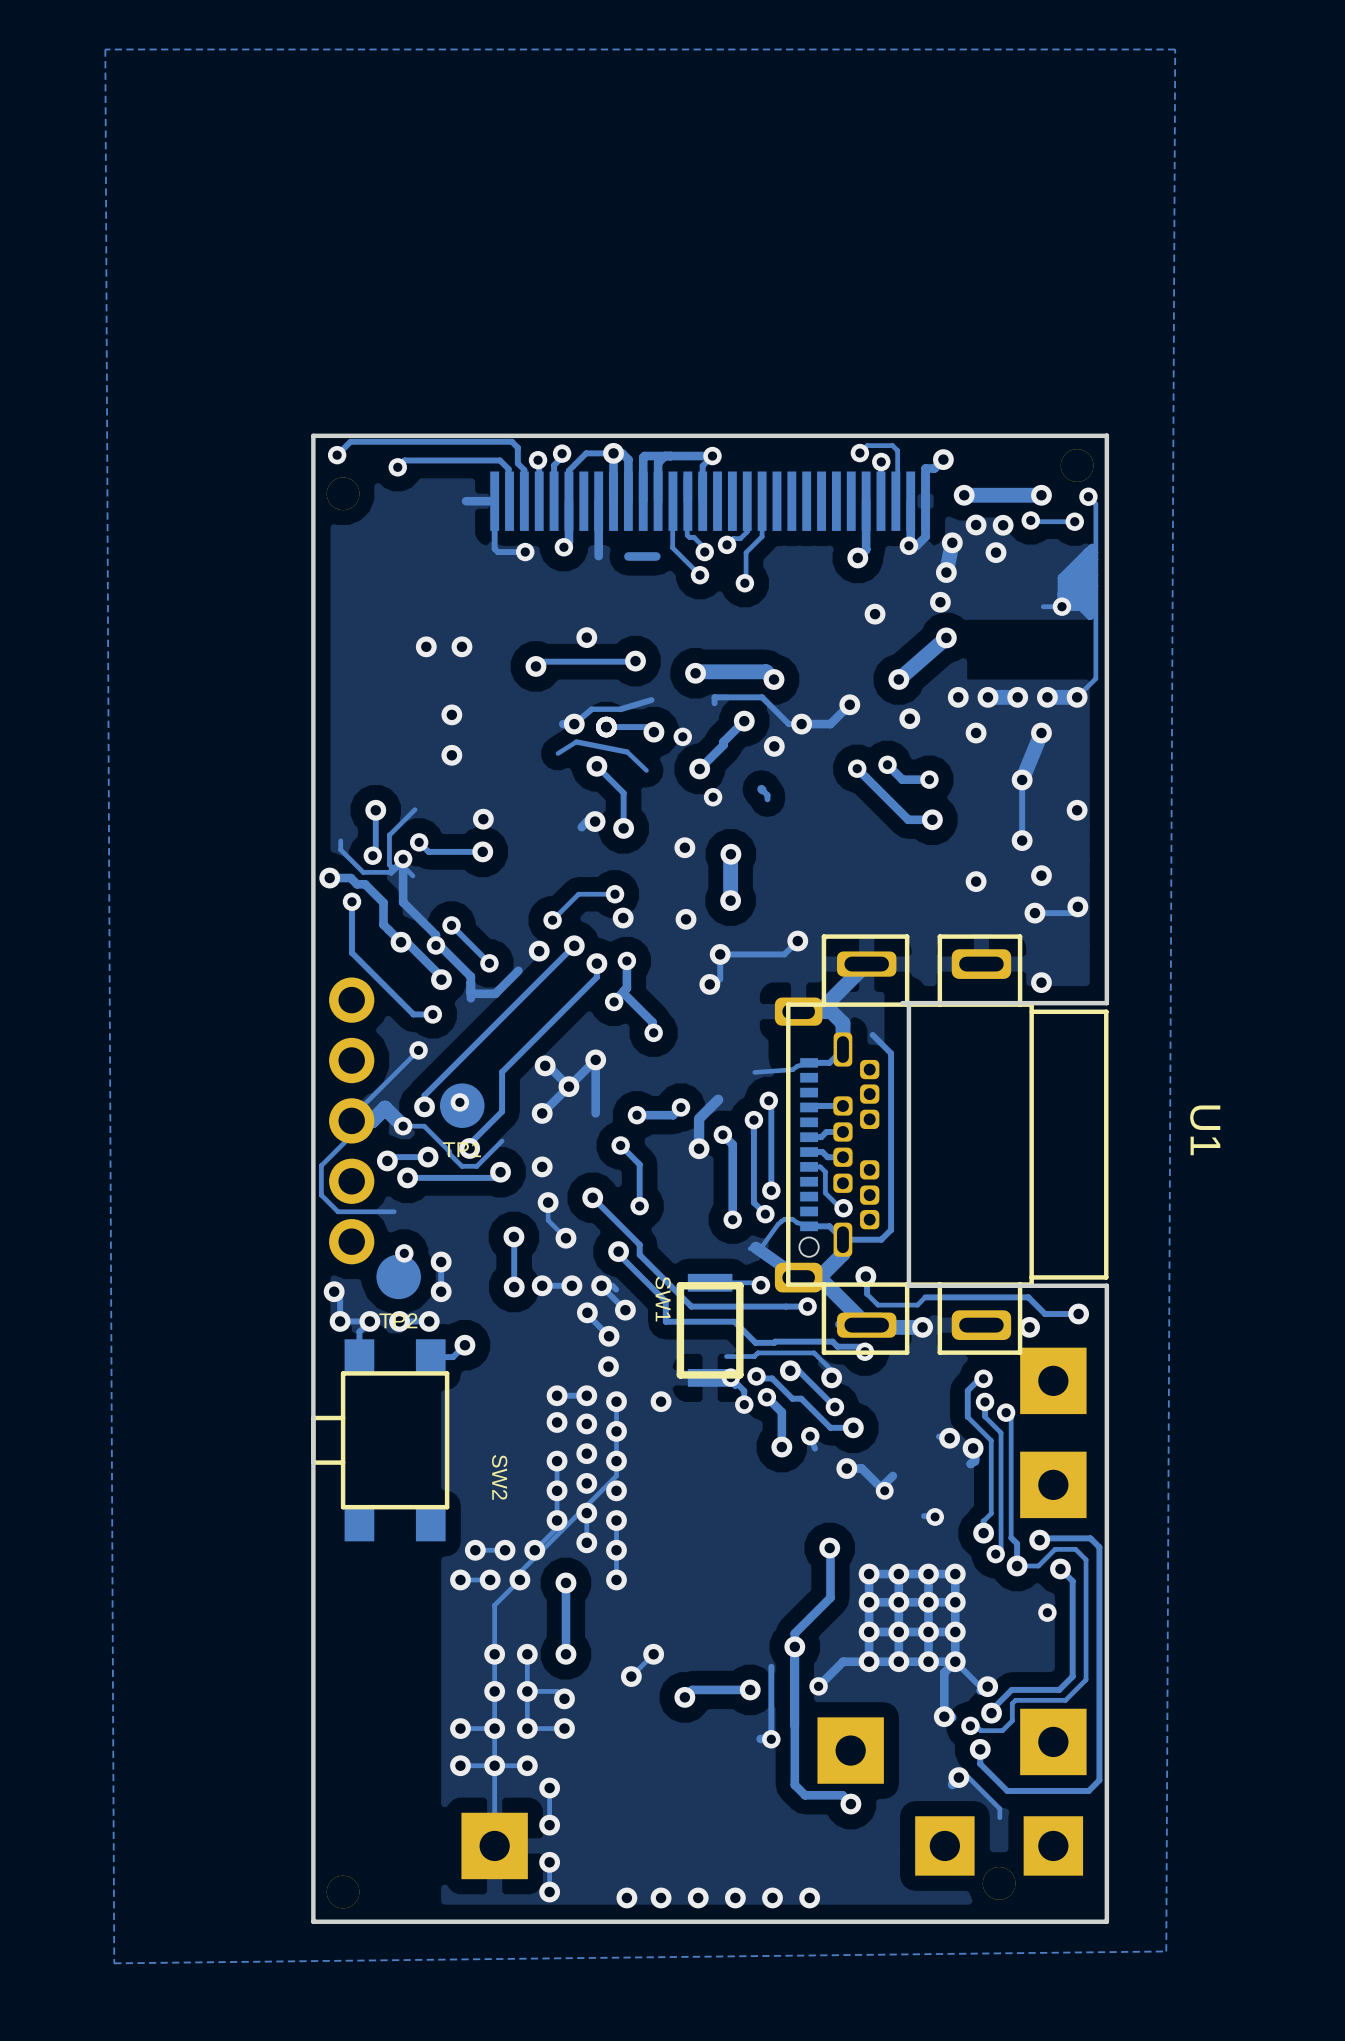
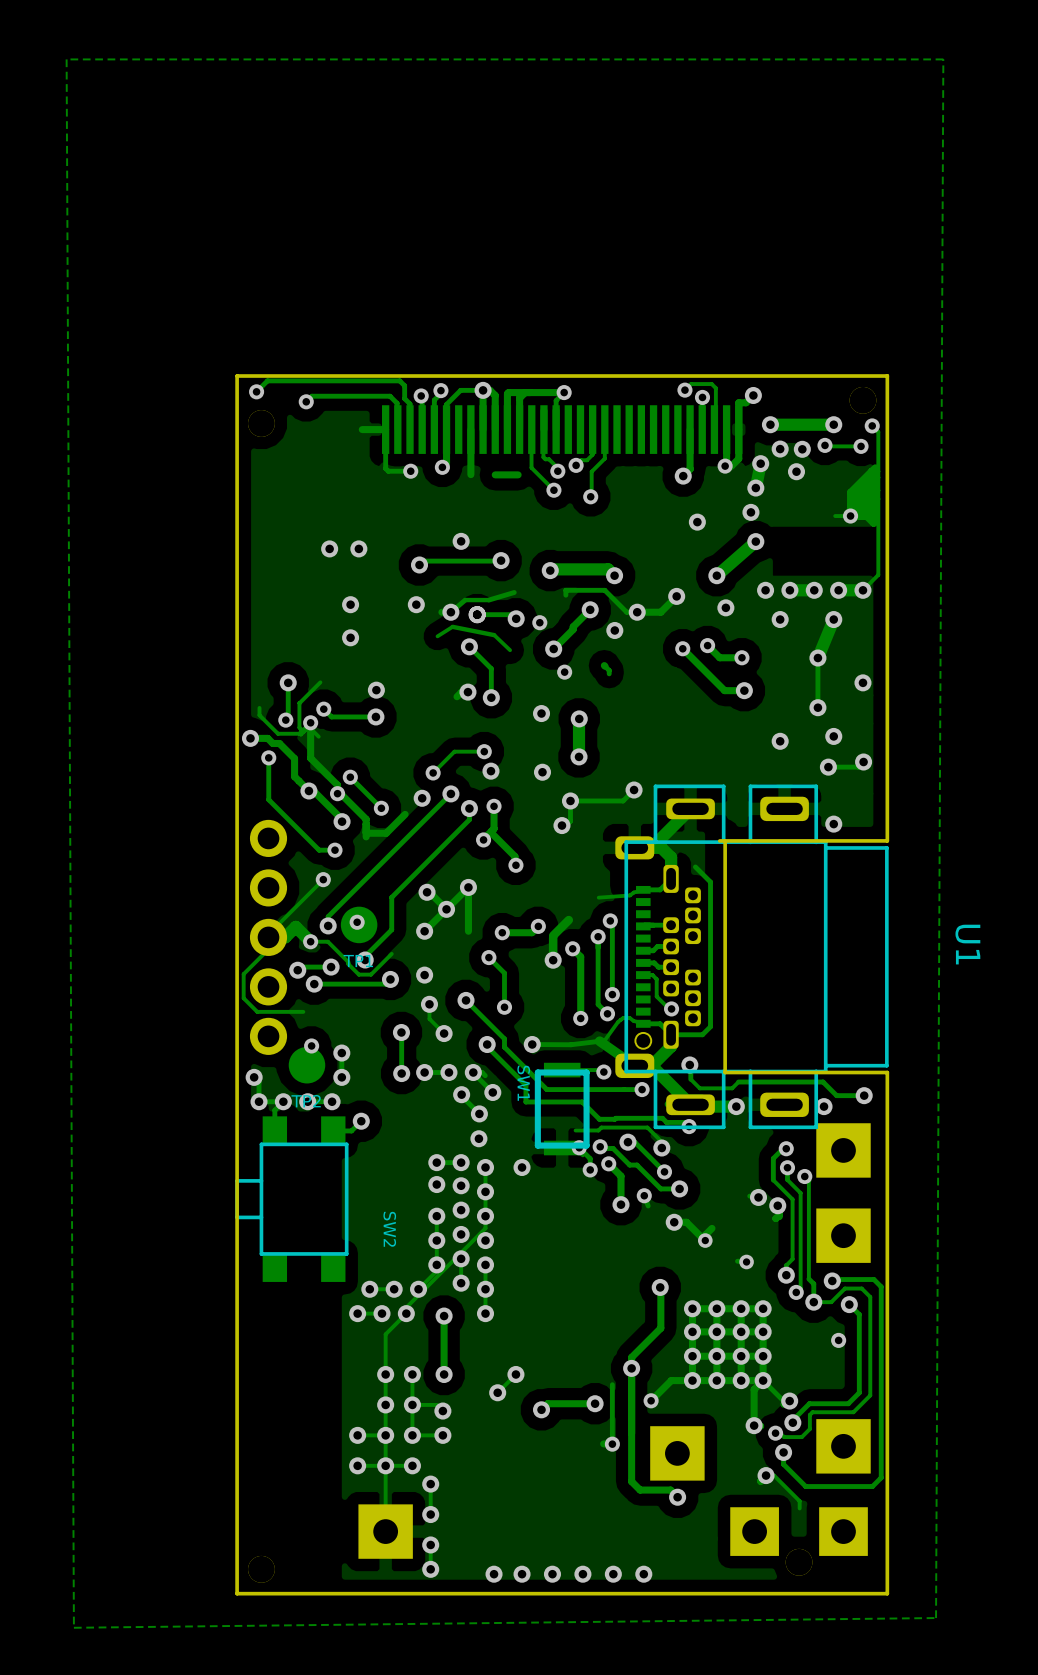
via: none -> (416, 604)
track: none -> (599, 1041) (570, 1044) (532, 1044)
via: none -> (532, 1044)

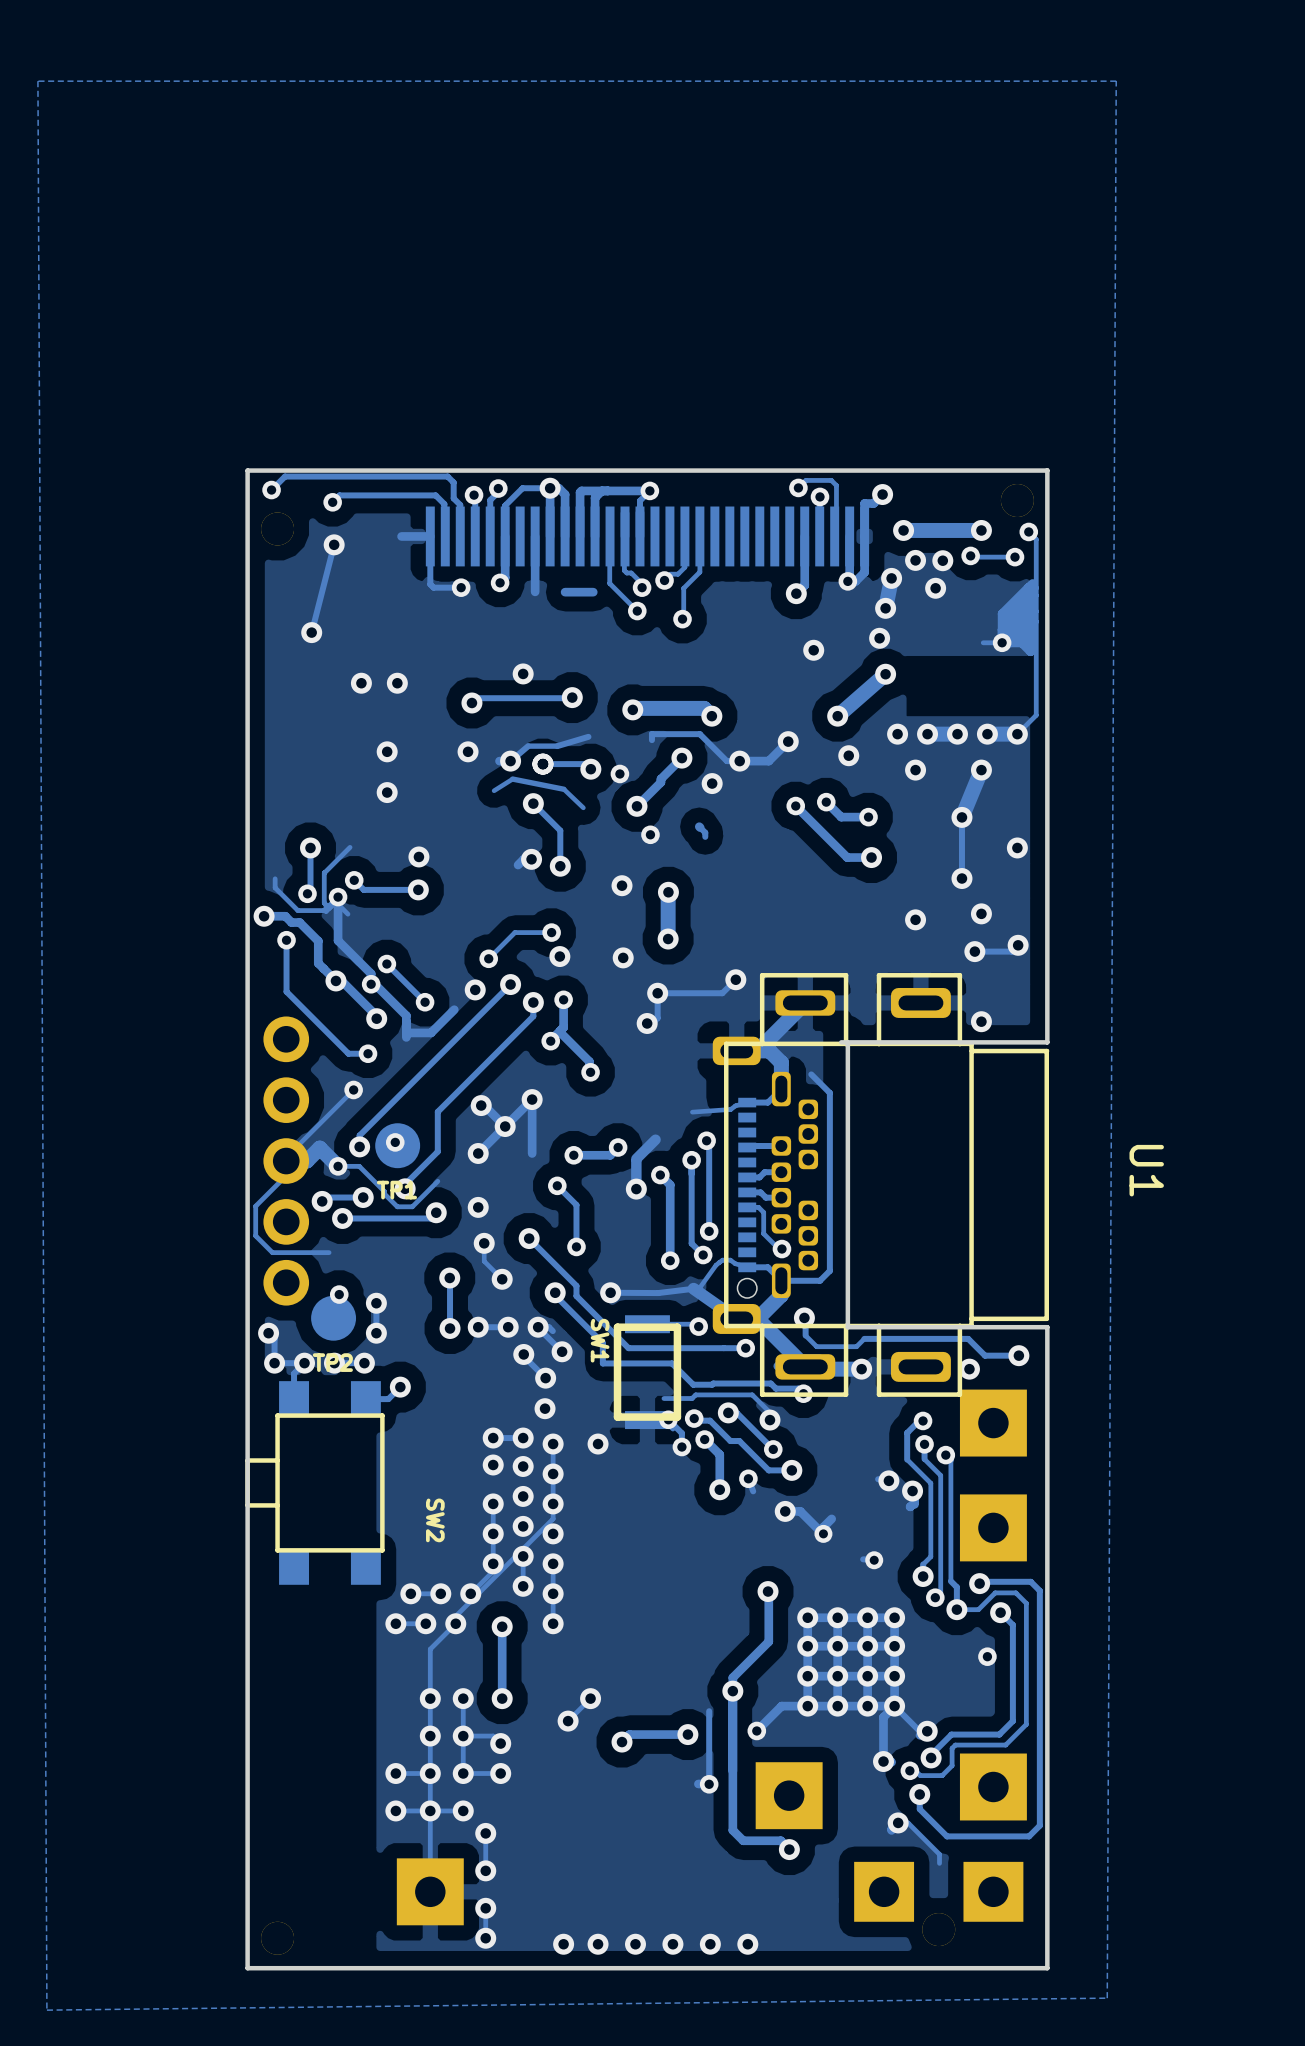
track: none -> (334, 544) (311, 632)
via: none -> (334, 544)
via: none -> (311, 632)

